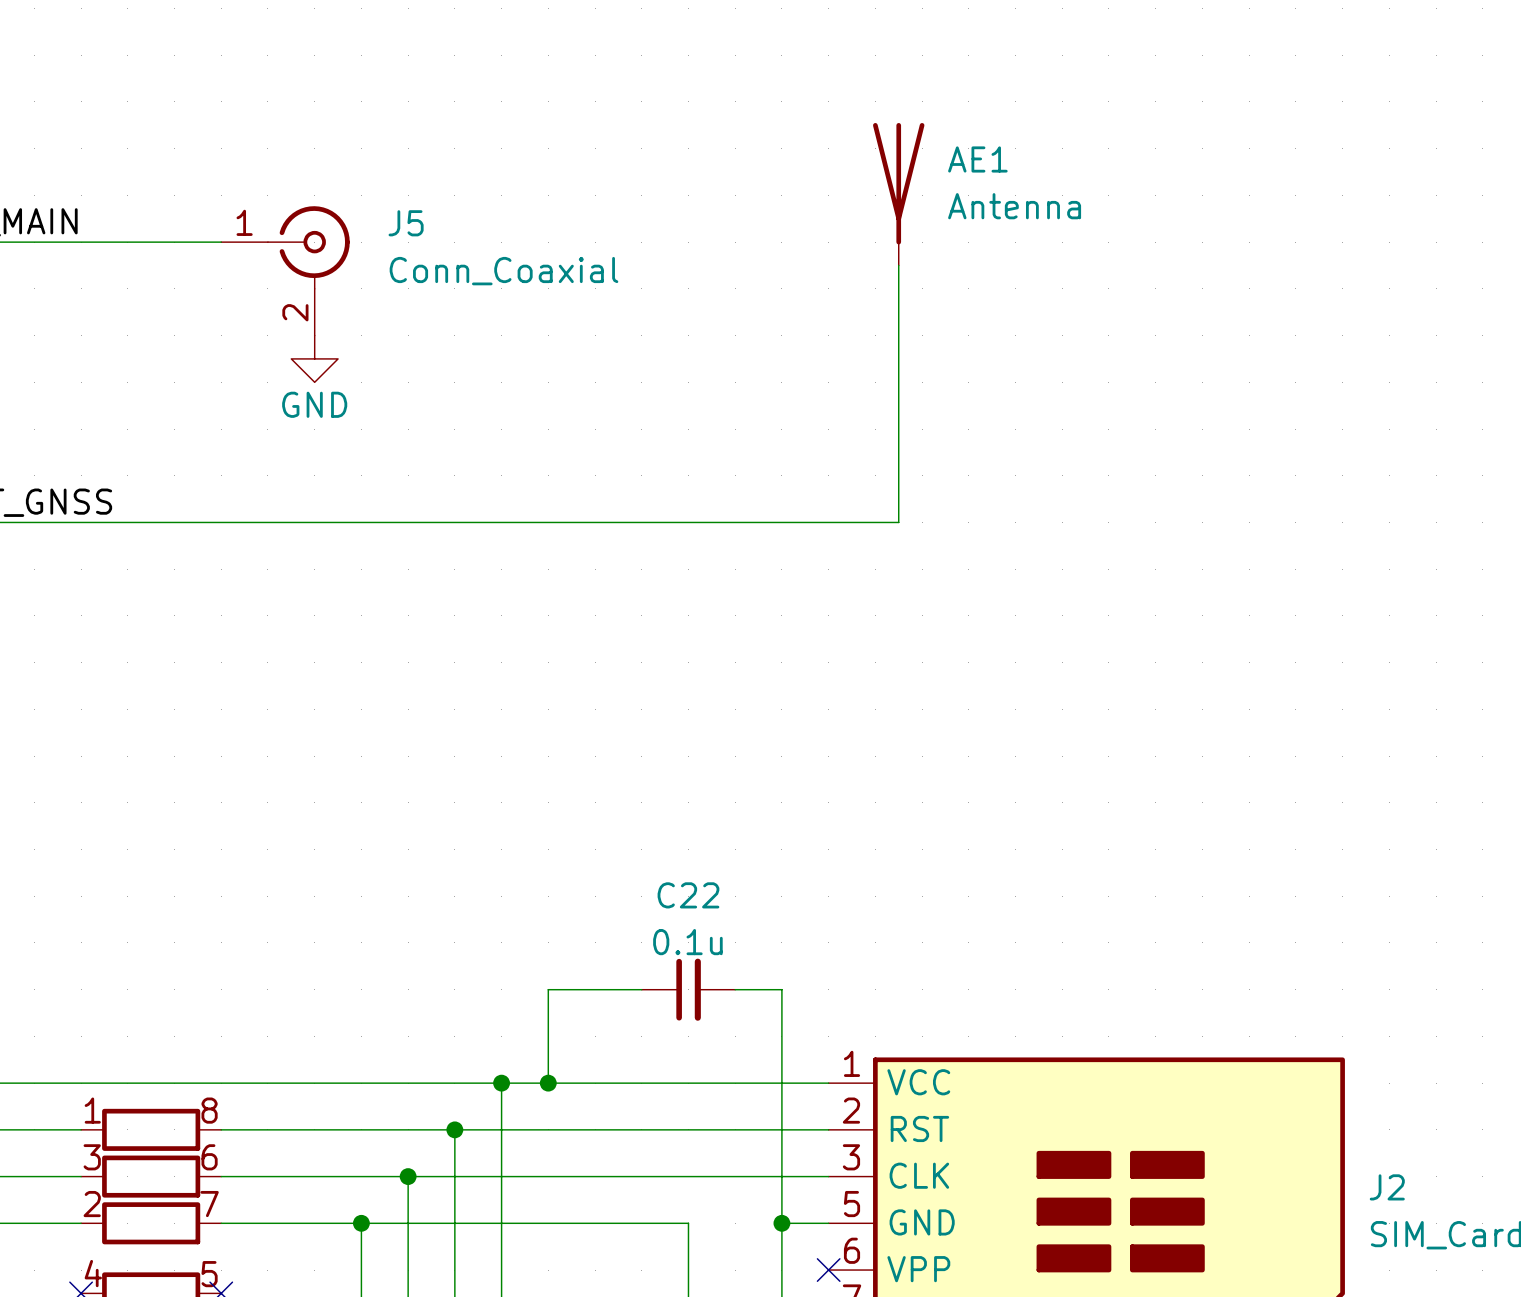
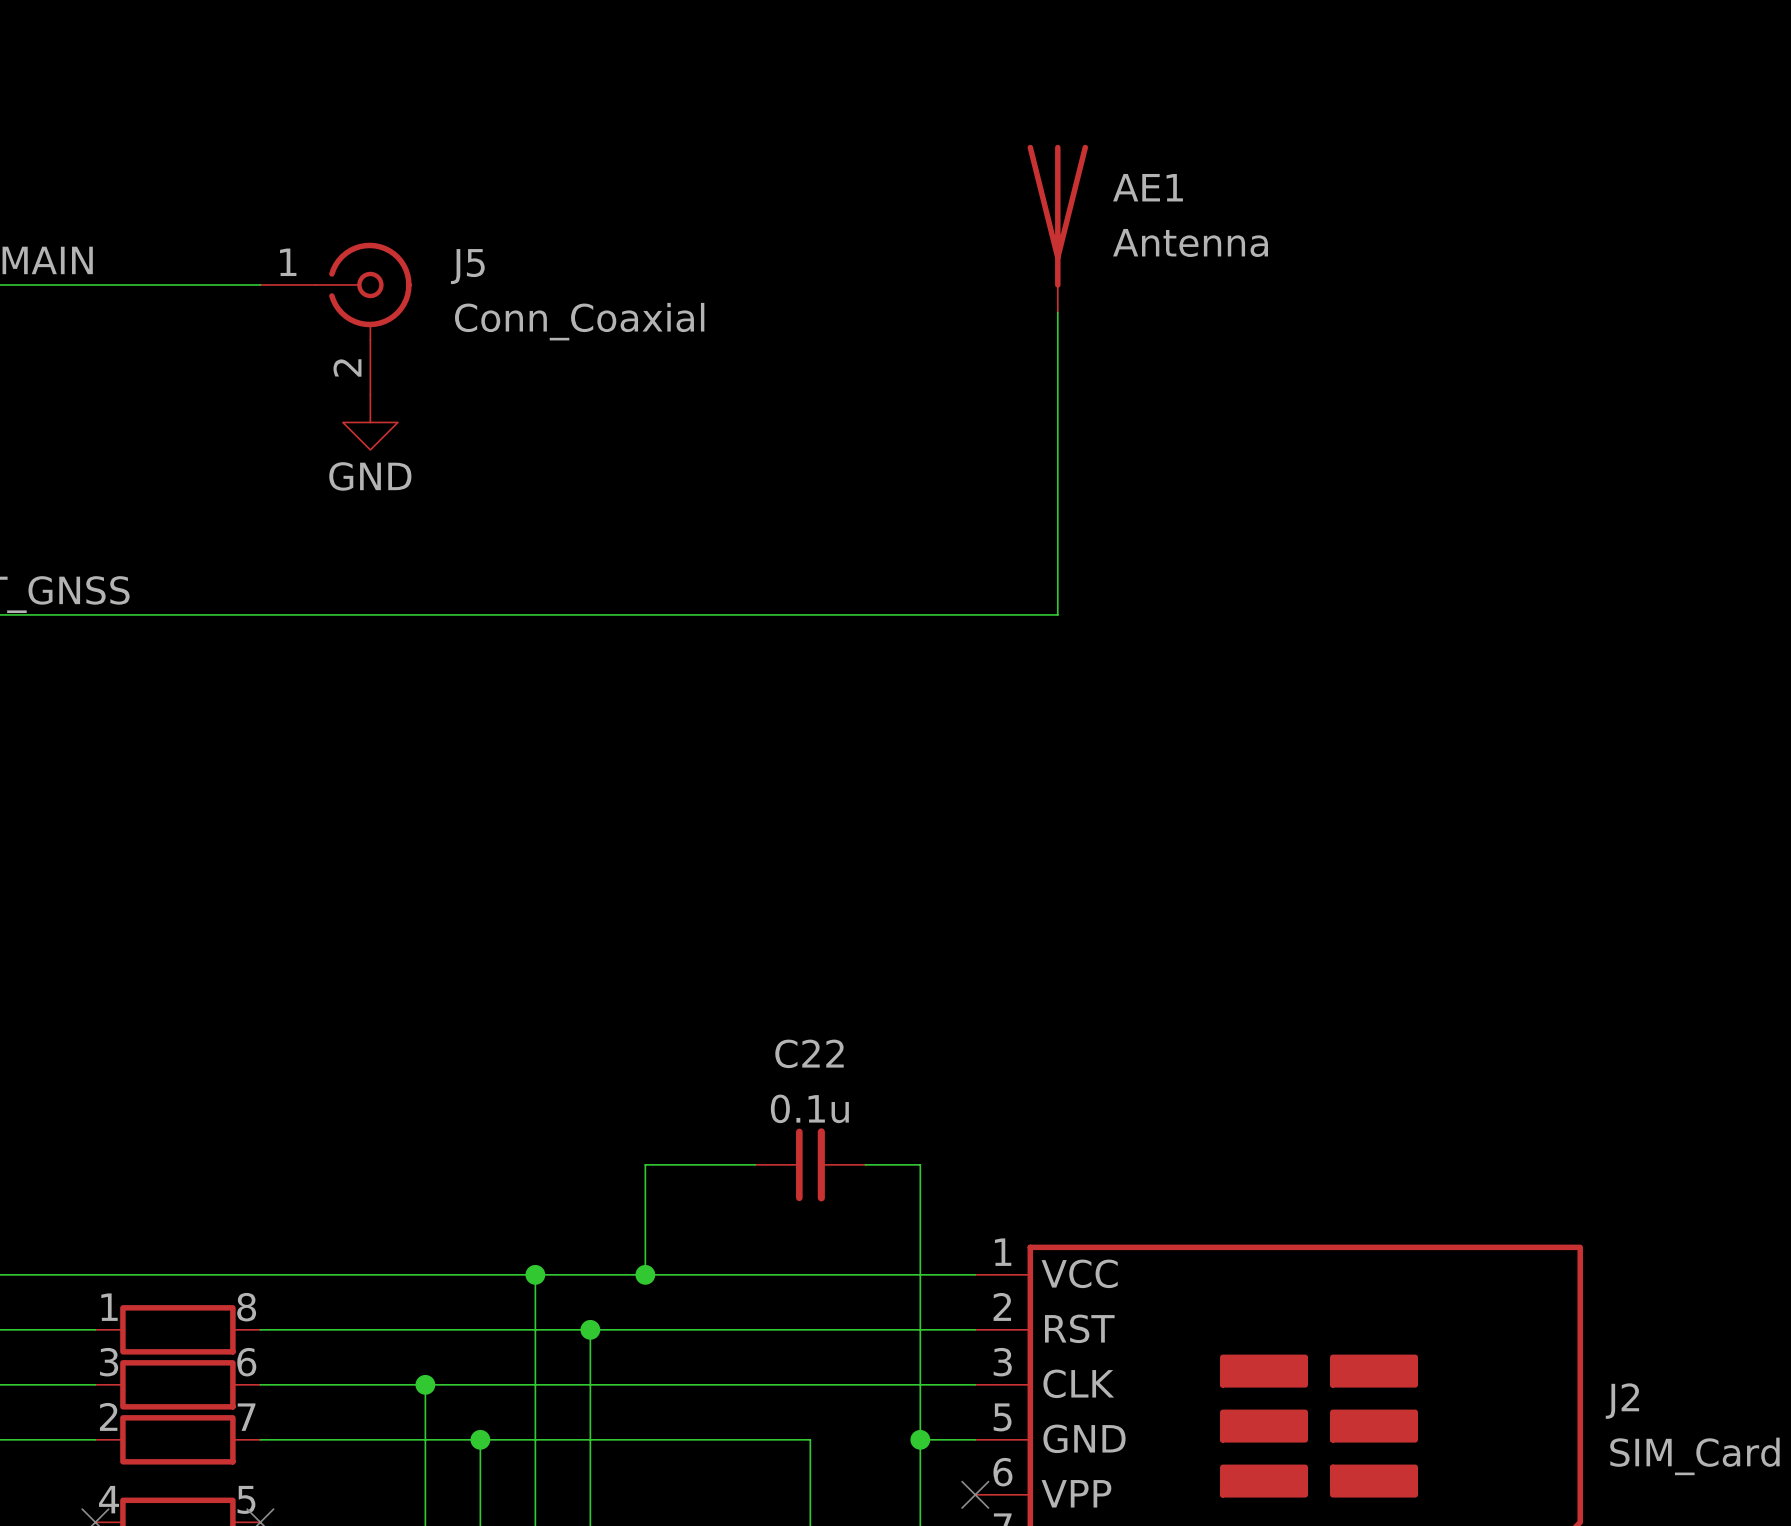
junction: none -> (535, 1274)
wire: (501, 1083) (501, 1129) -> (535, 1274) (535, 1329)
junction: (501, 1083) -> none
junction: (454, 1129) -> none
junction: none -> (590, 1329)
junction: none -> (425, 1384)
wire: (408, 1176) (408, 1223) -> (425, 1384) (425, 1439)
junction: (408, 1176) -> none
junction: (361, 1223) -> none
junction: none -> (480, 1439)

